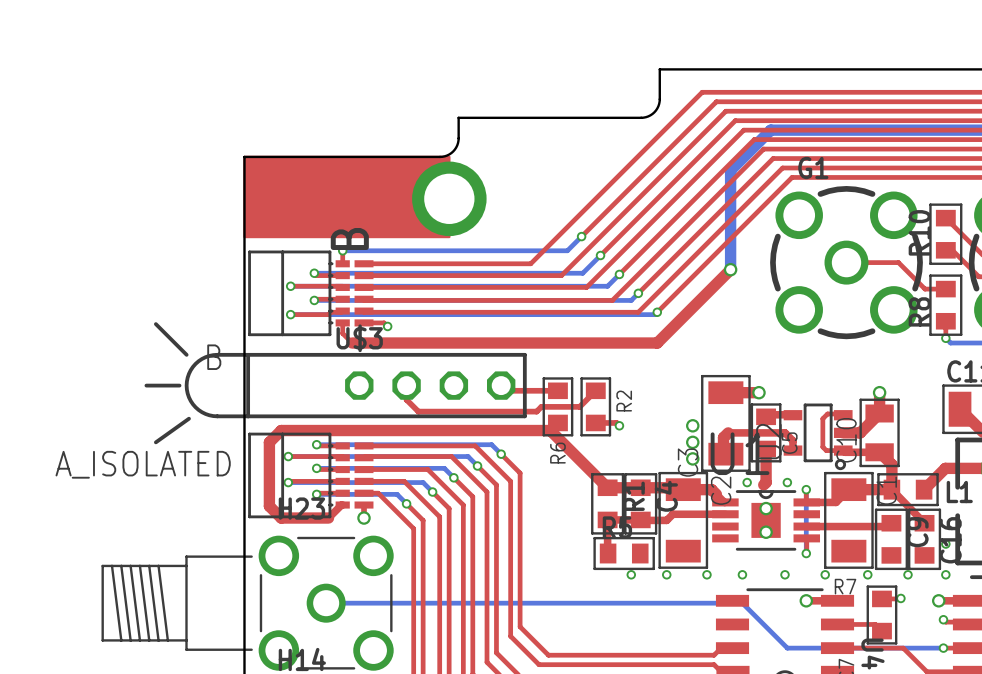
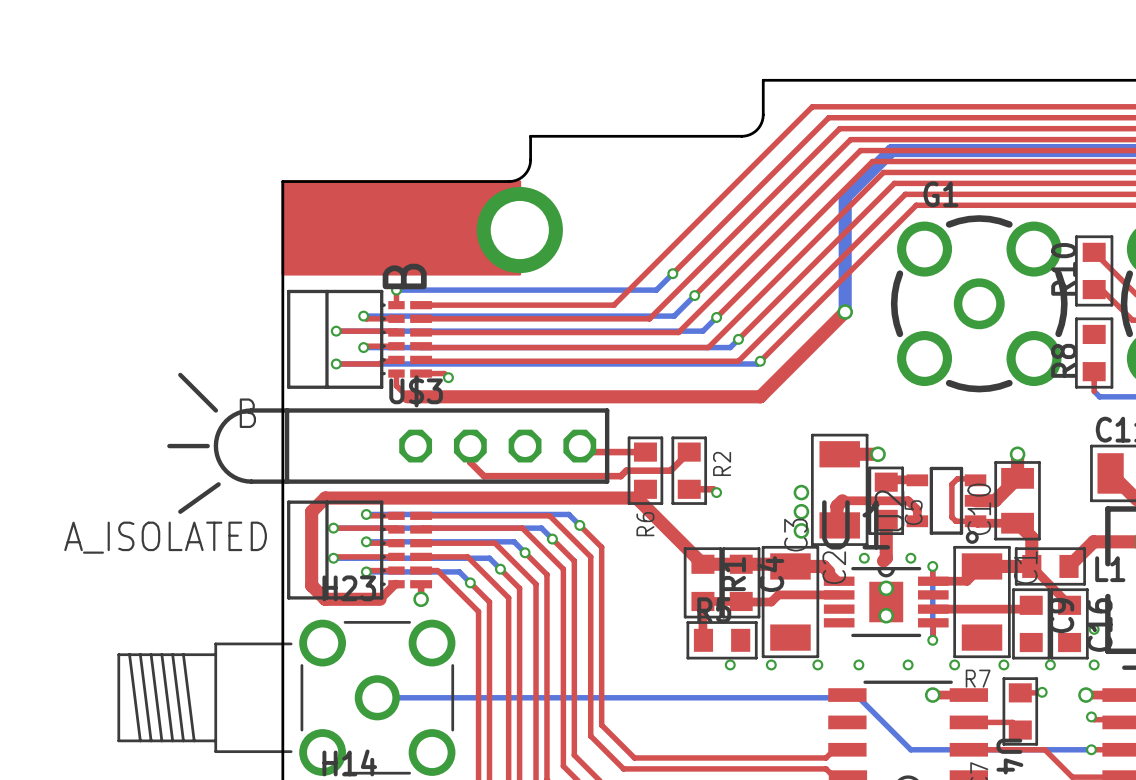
top track: (846, 262) (898, 262) (925, 289) (945, 289) -> none
via: (945, 338) -> none

